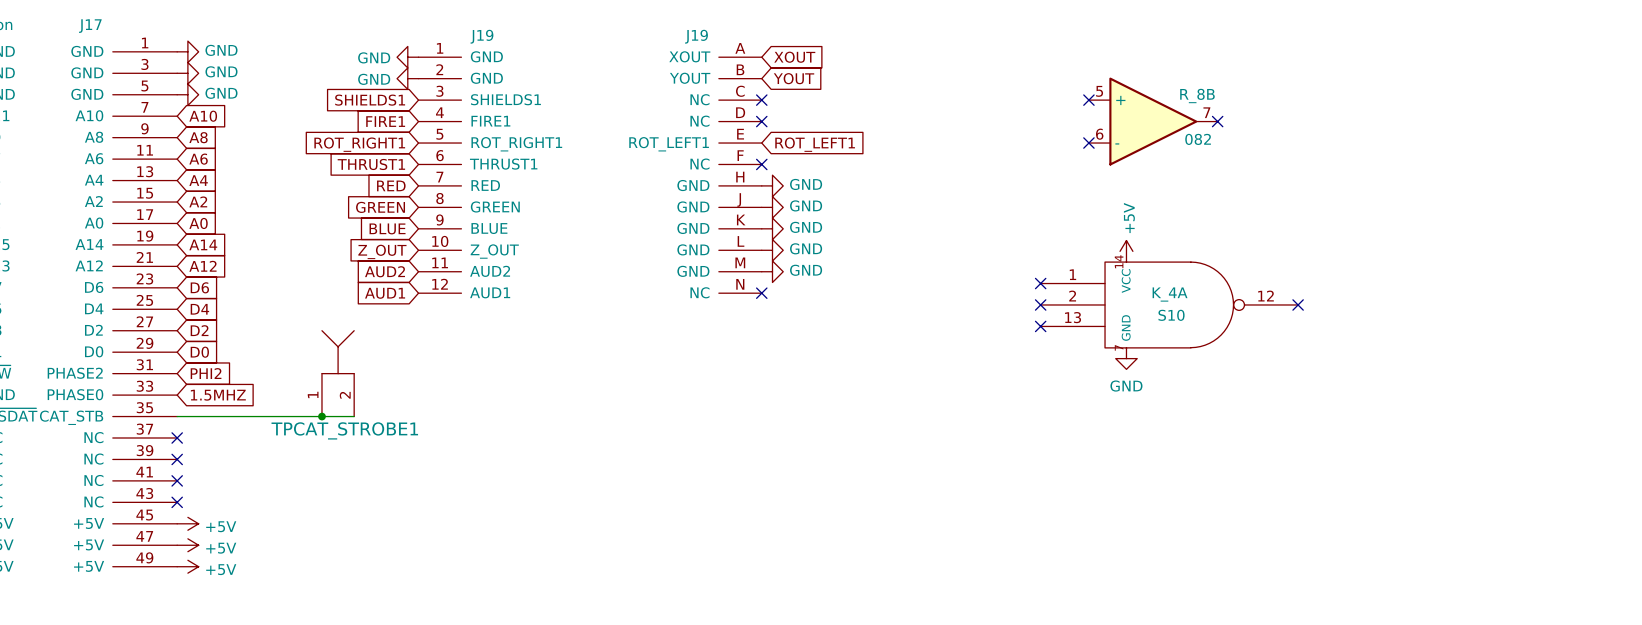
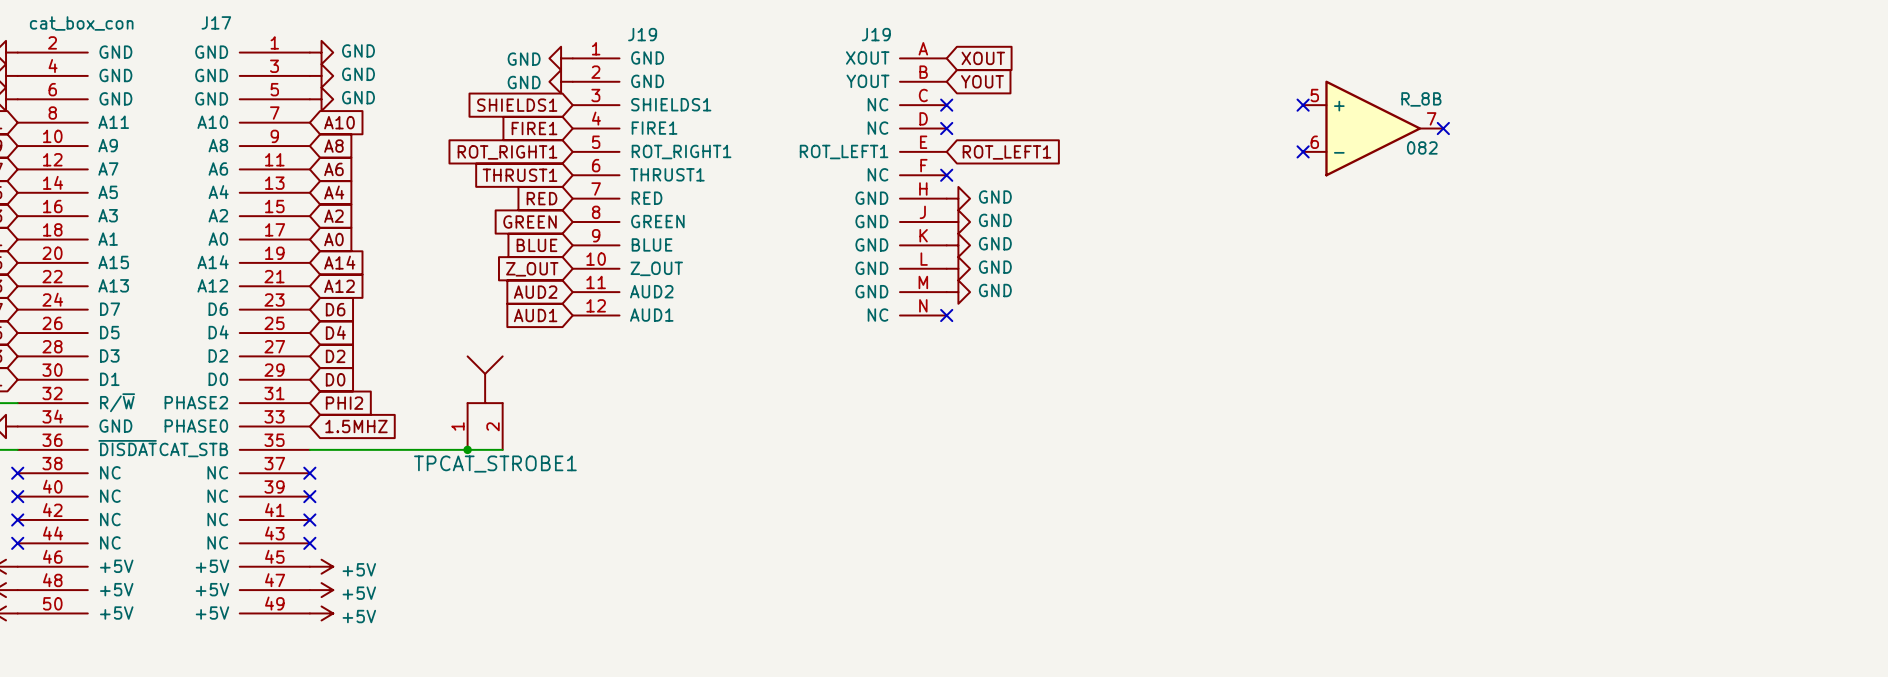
power symbol: +5V (1126, 251) -> none
no-connect mark: (1040, 283) -> none
no-connect mark: (1040, 304) -> none
K_4A: S10 (1169, 304) -> none
no-connect mark: (1298, 304) -> none
no-connect mark: (1040, 326) -> none
power symbol: GND (1126, 358) -> none

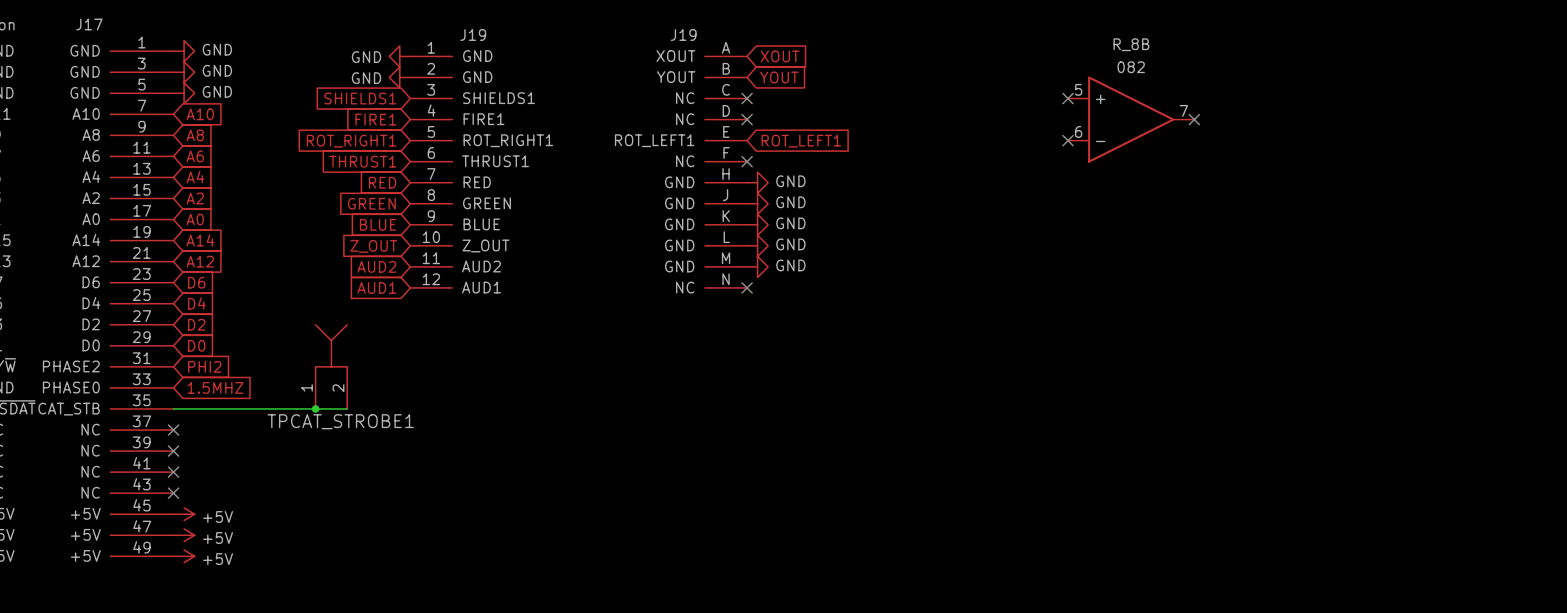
R_8B name position: R_8B (1421, 99) -> R_8B (1131, 44)
R_8B value position: 082 (1422, 147) -> 082 (1131, 67)

